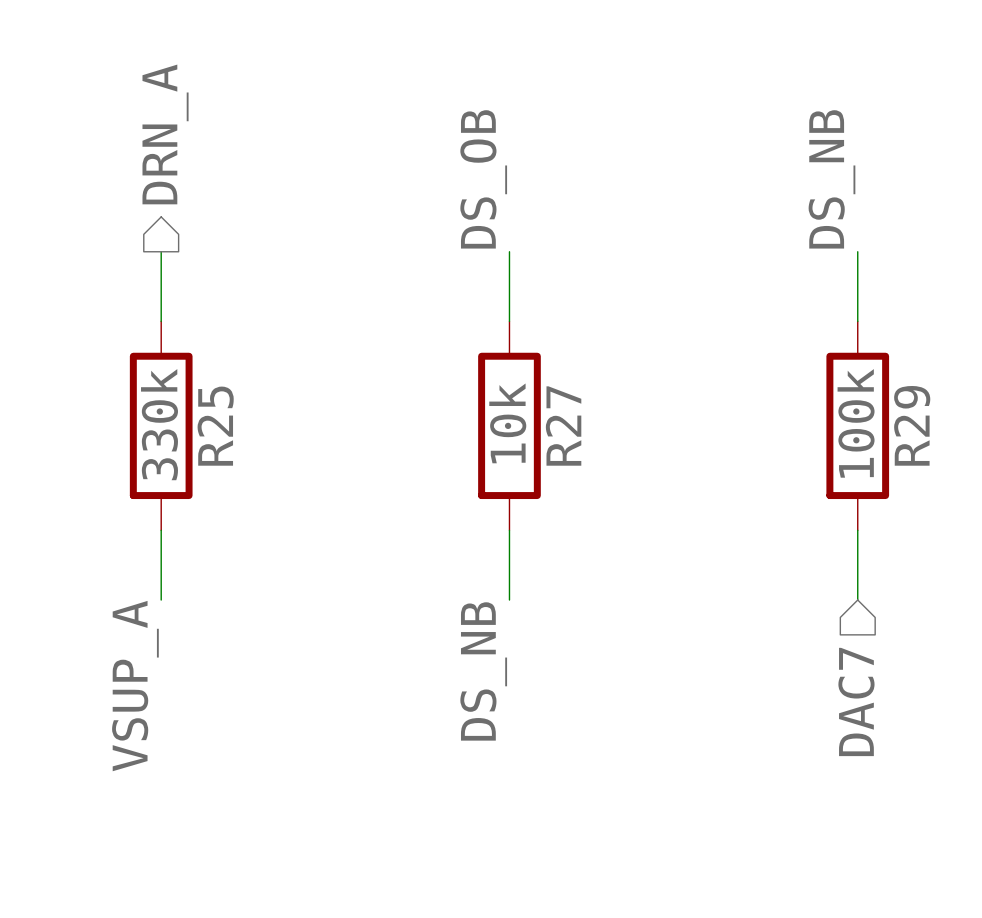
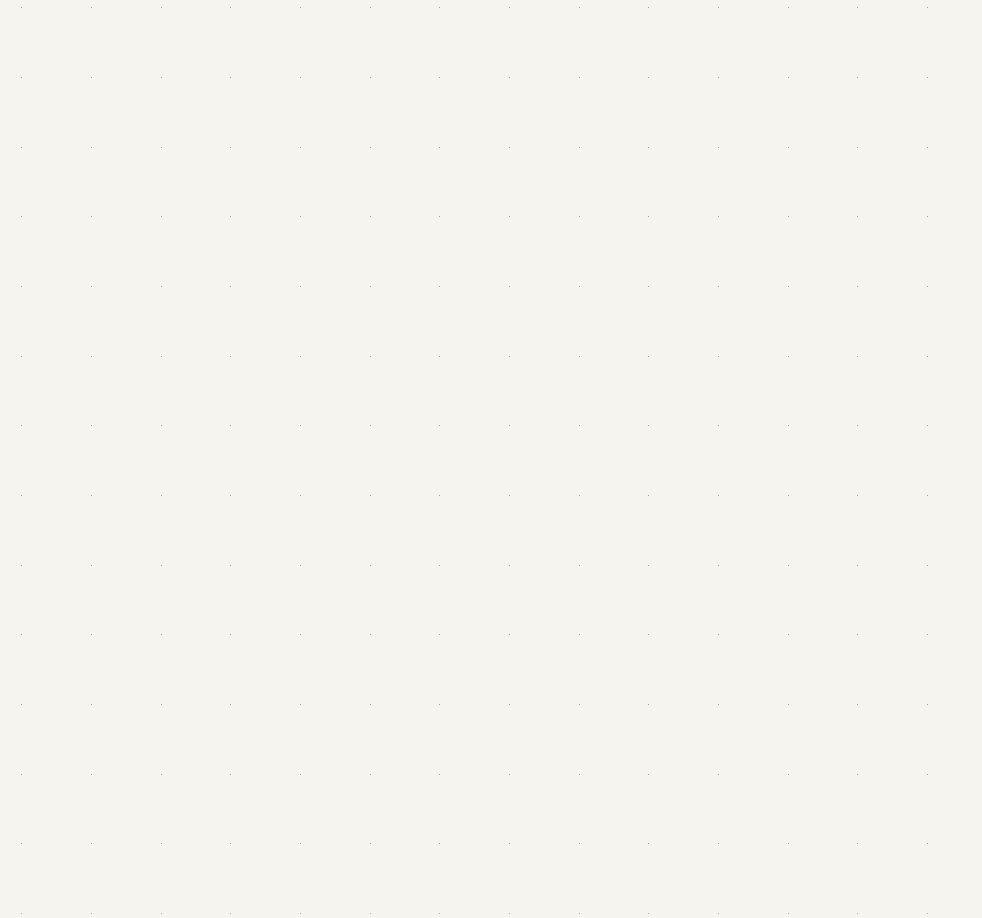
hierarchical label: DRN_A (165, 134) -> none
label: DS_OB (483, 179) -> none
label: DS_NB (831, 179) -> none
wire: (161, 251) (161, 321) -> none
wire: (509, 251) (509, 321) -> none
wire: (857, 251) (857, 321) -> none
R25: 330k (161, 425) -> none
R27: 10k (509, 425) -> none
R29: 100k (857, 425) -> none
wire: (161, 530) (161, 600) -> none
wire: (509, 530) (509, 600) -> none
wire: (857, 530) (857, 600) -> none
label: DS_NB (483, 671) -> none
label: VSUP_A (135, 686) -> none
hierarchical label: DAC7 (856, 701) -> none

